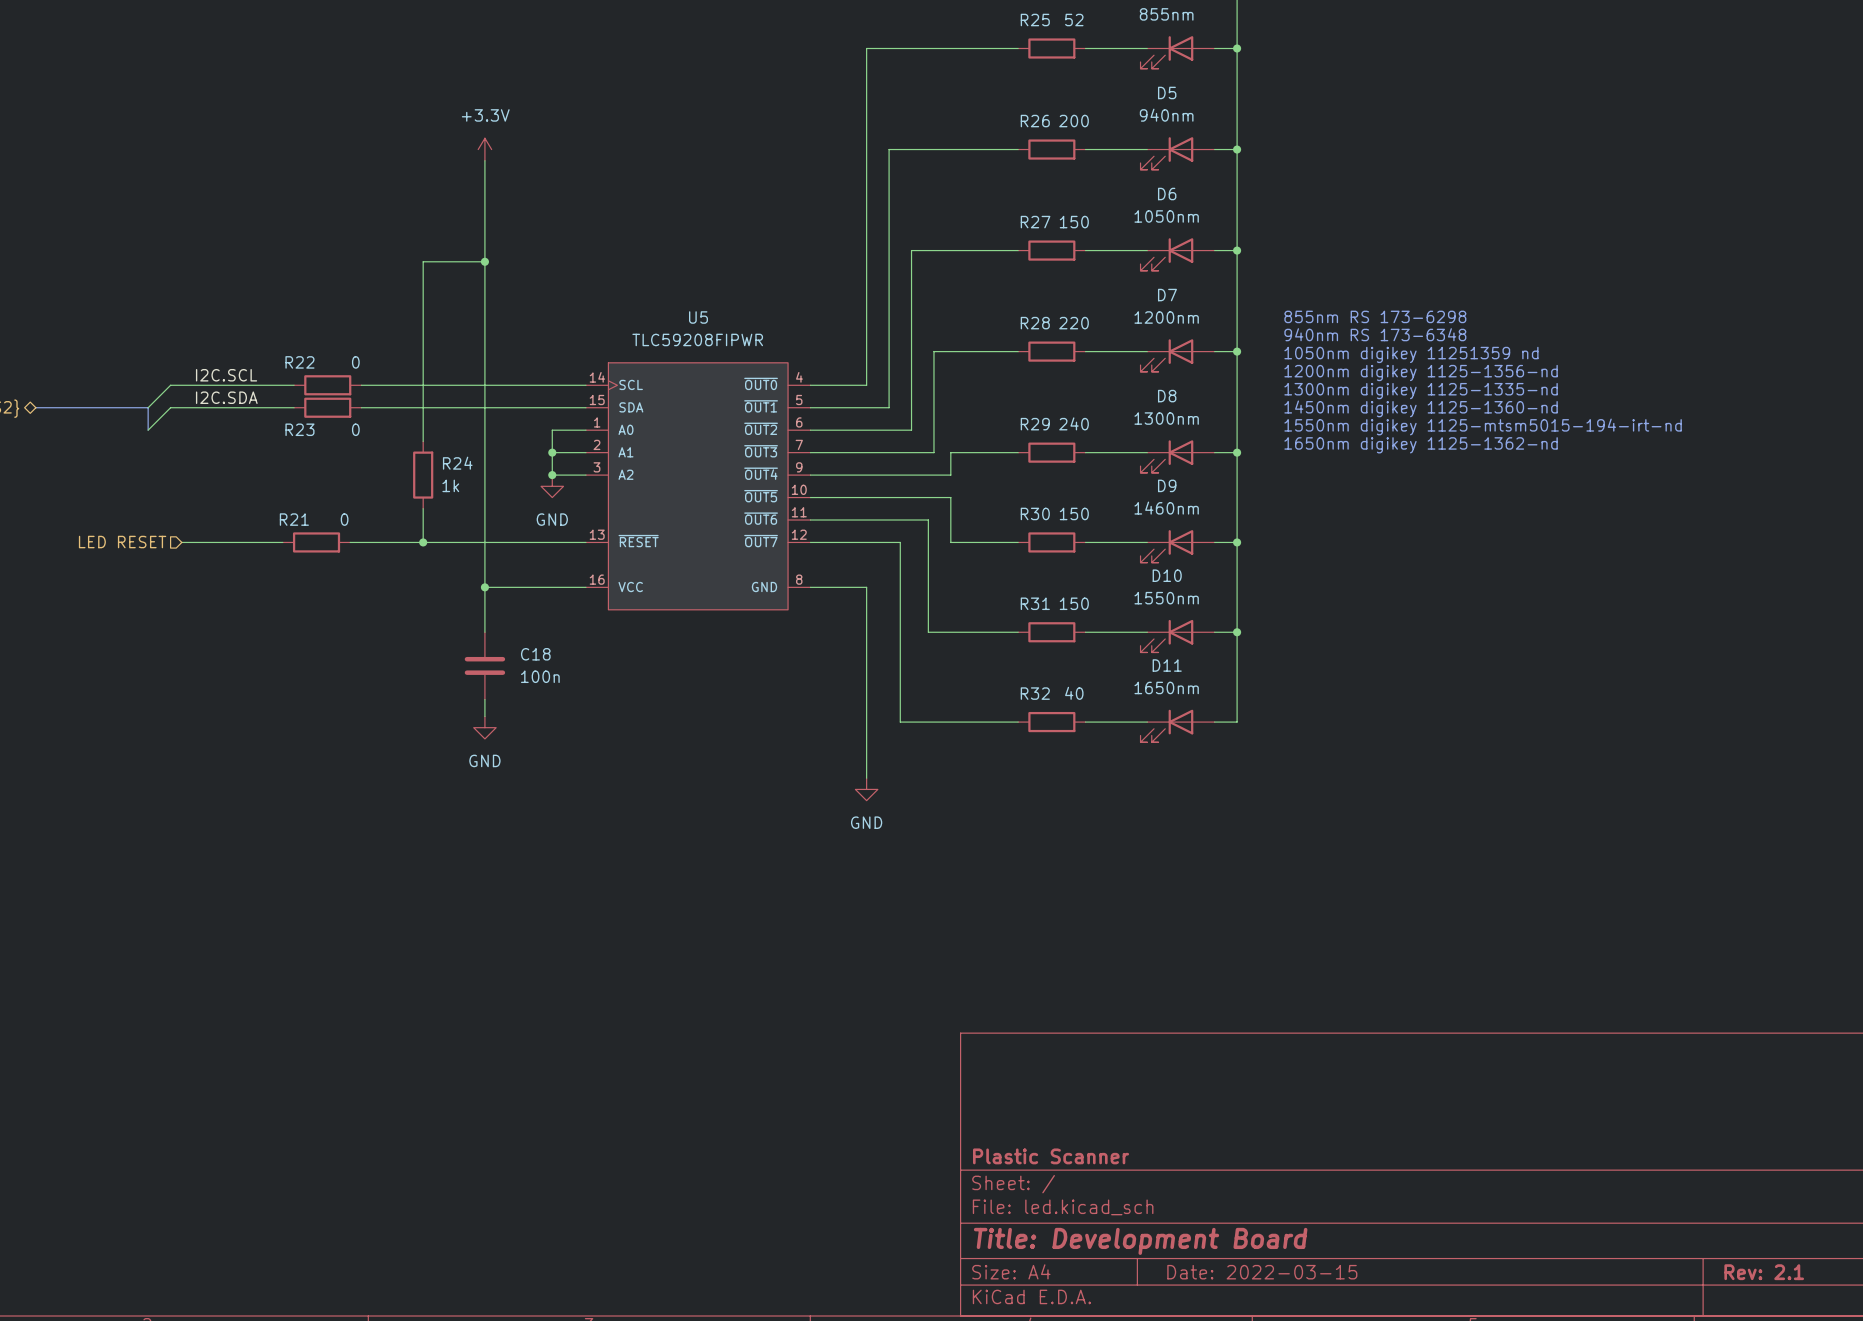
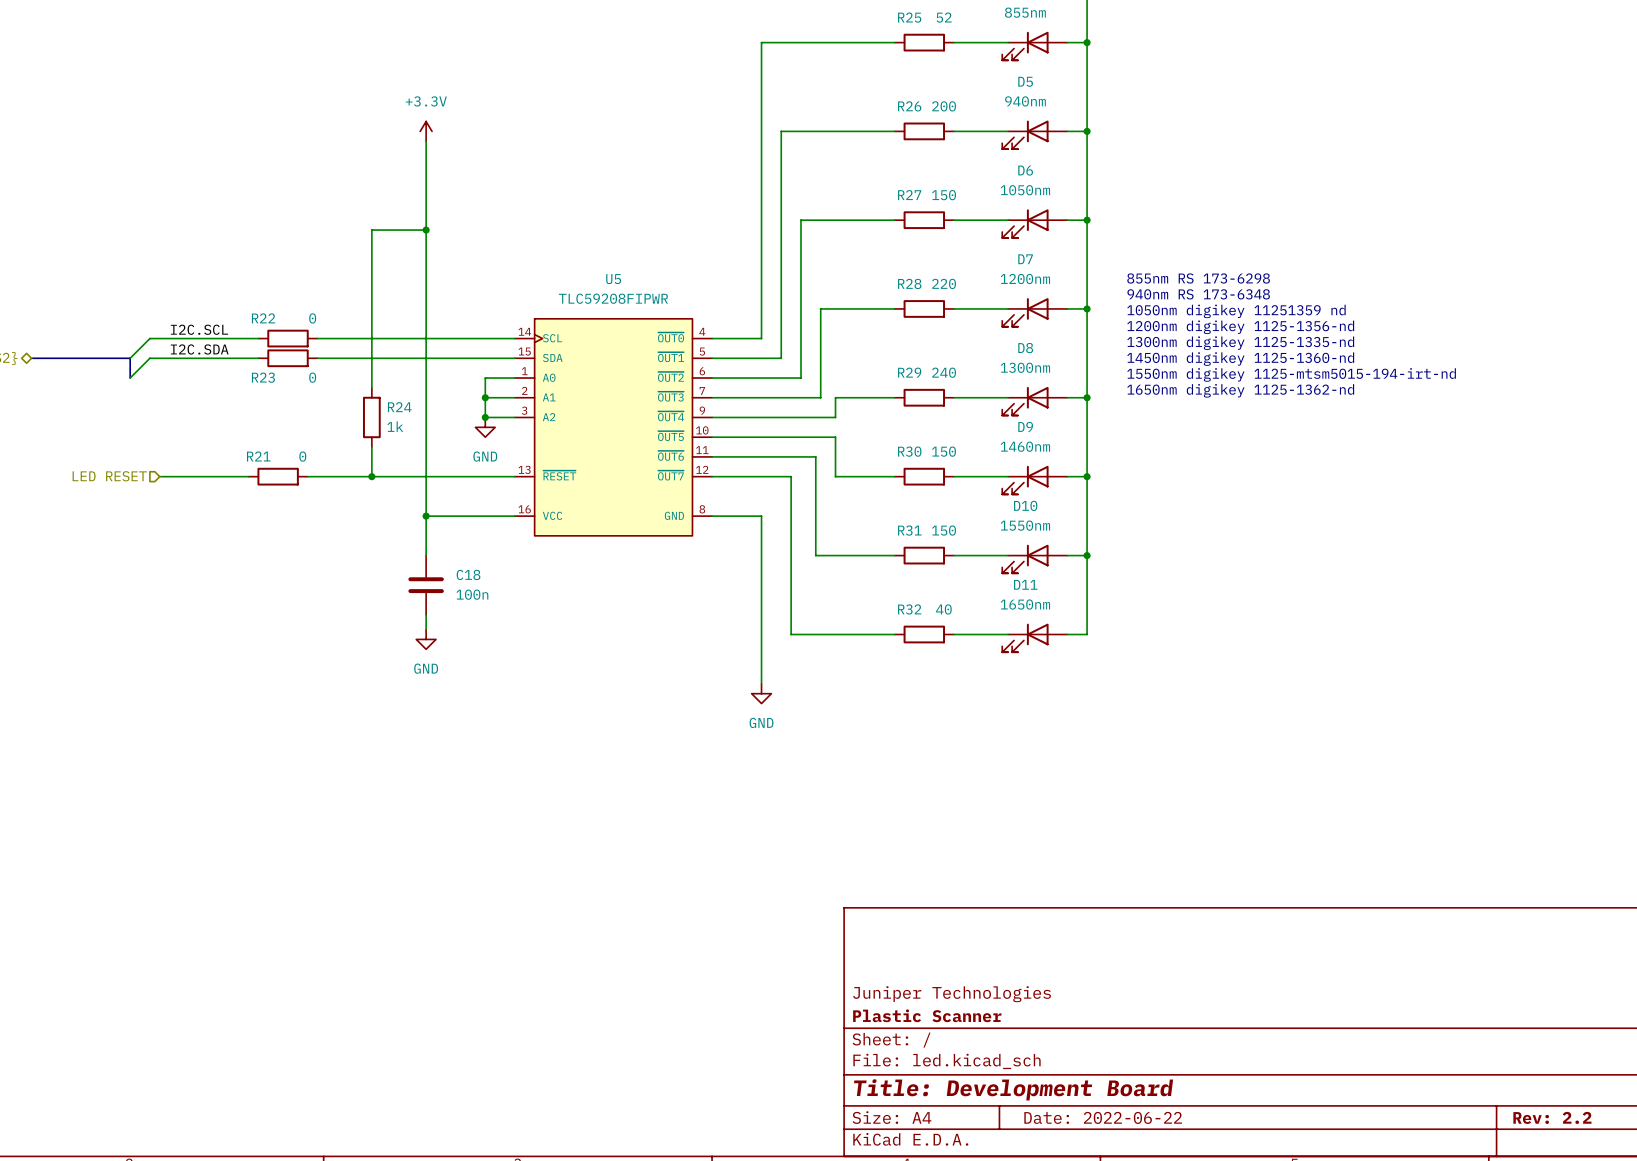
title block: none -> Juniper Technologies (952, 994)
title block: Date: 2022-03-15 (1262, 1272) -> Date: 2022-06-22 (1103, 1117)
title block: Rev: 2.1 (1764, 1272) -> Rev: 2.2 (1552, 1117)

